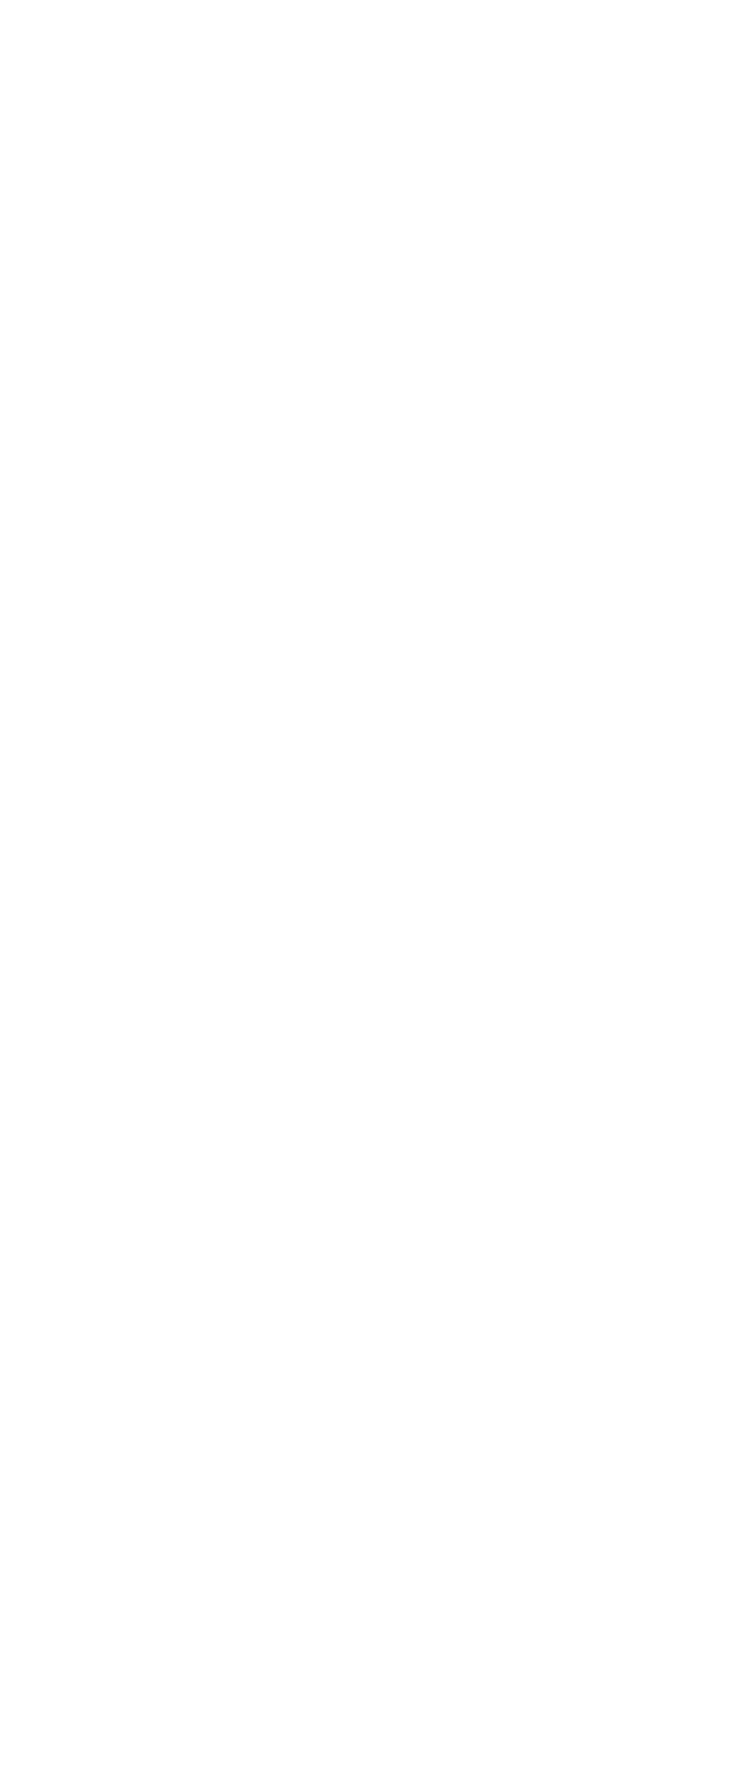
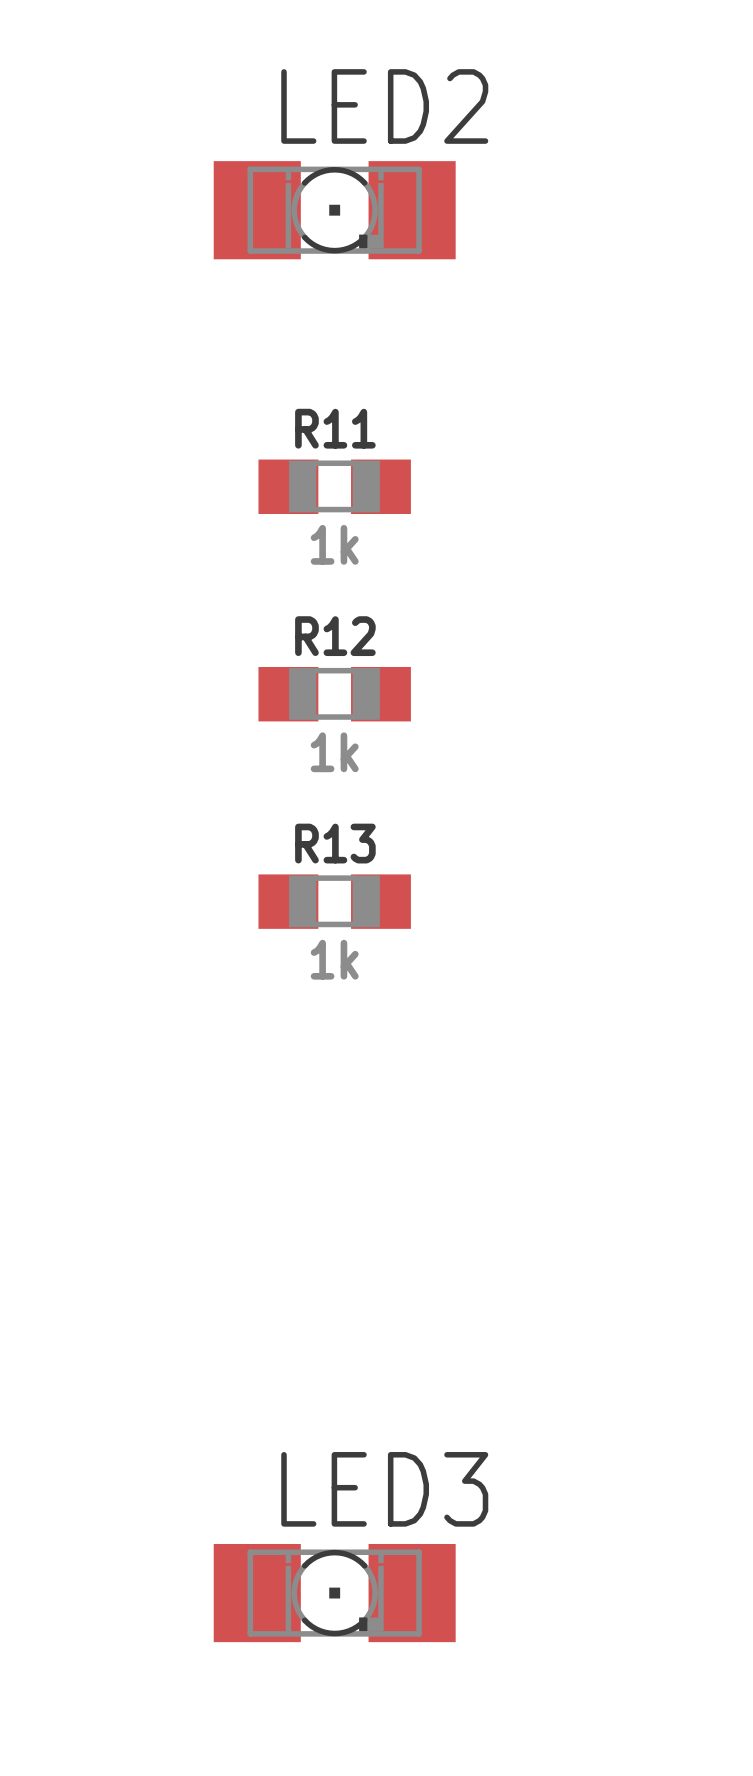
LED2: none -> (334, 210)
R11: none -> 1k (334, 486)
R12: none -> 1k (334, 694)
R13: none -> 1k (334, 901)
LED3: none -> (334, 1593)

